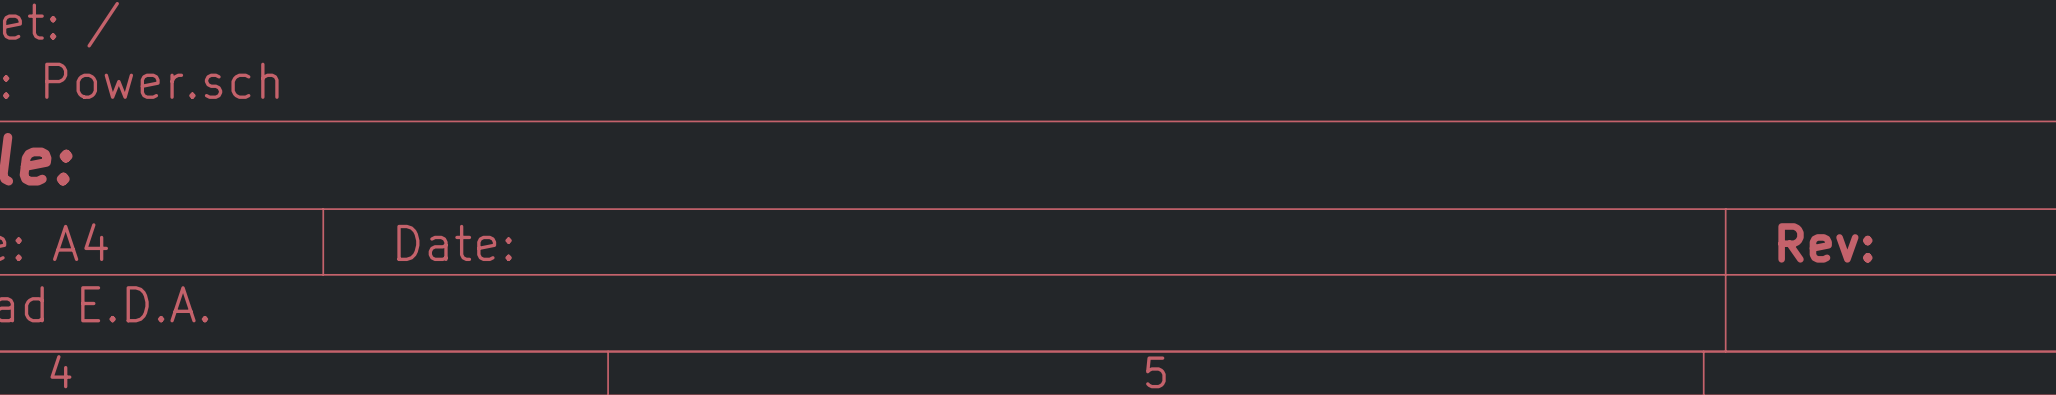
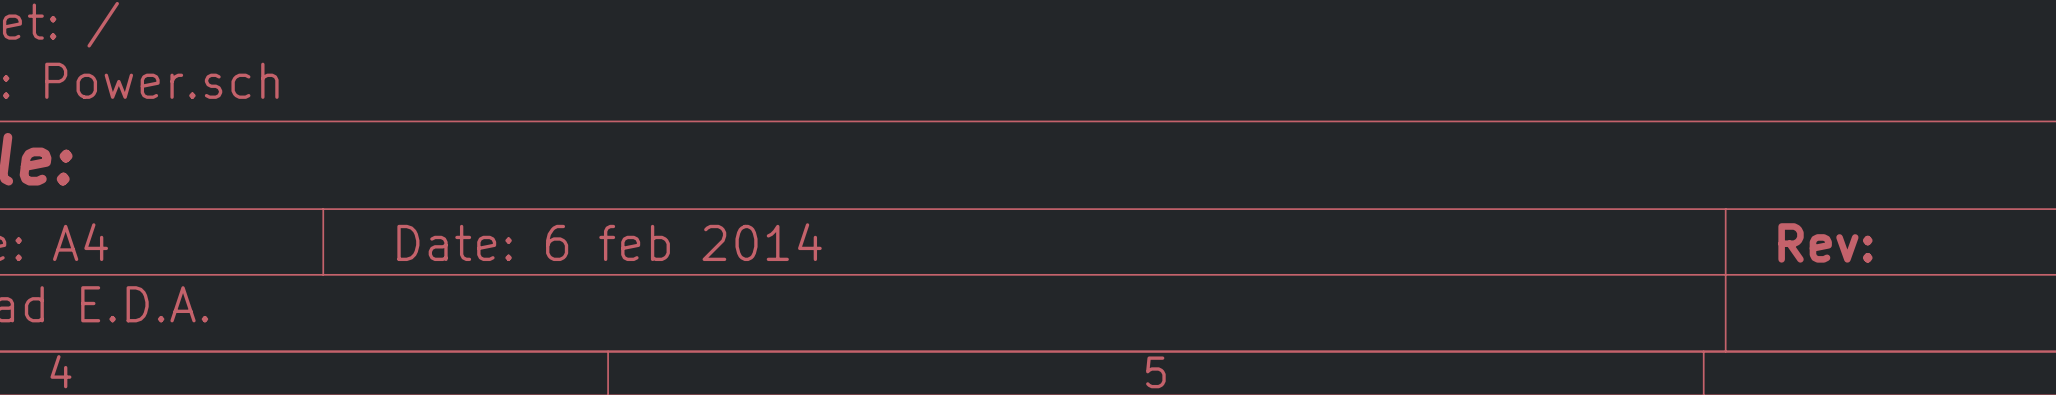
title block: Date: (454, 242) -> Date: 6 feb 2014 (609, 242)

